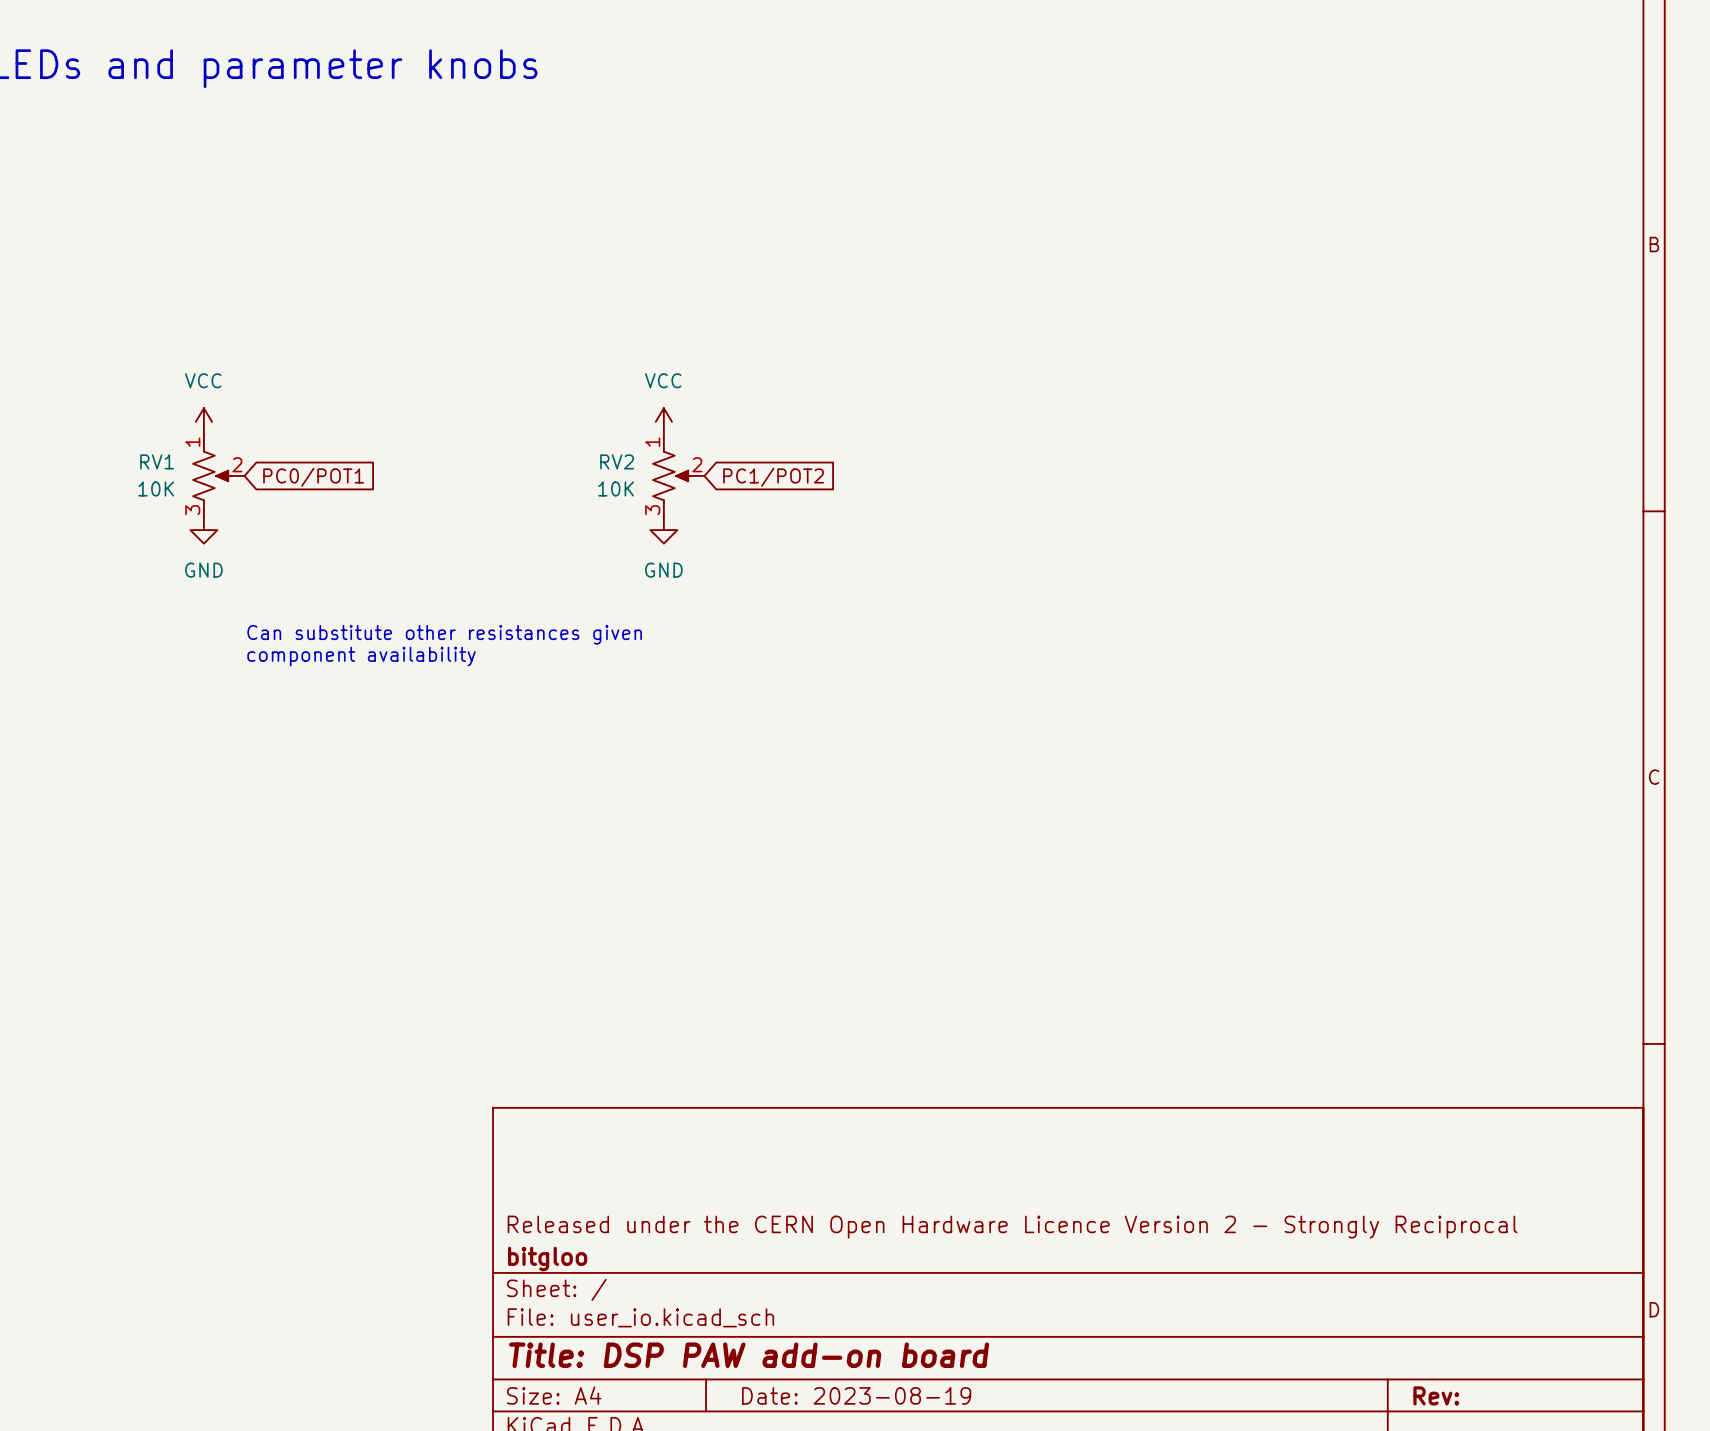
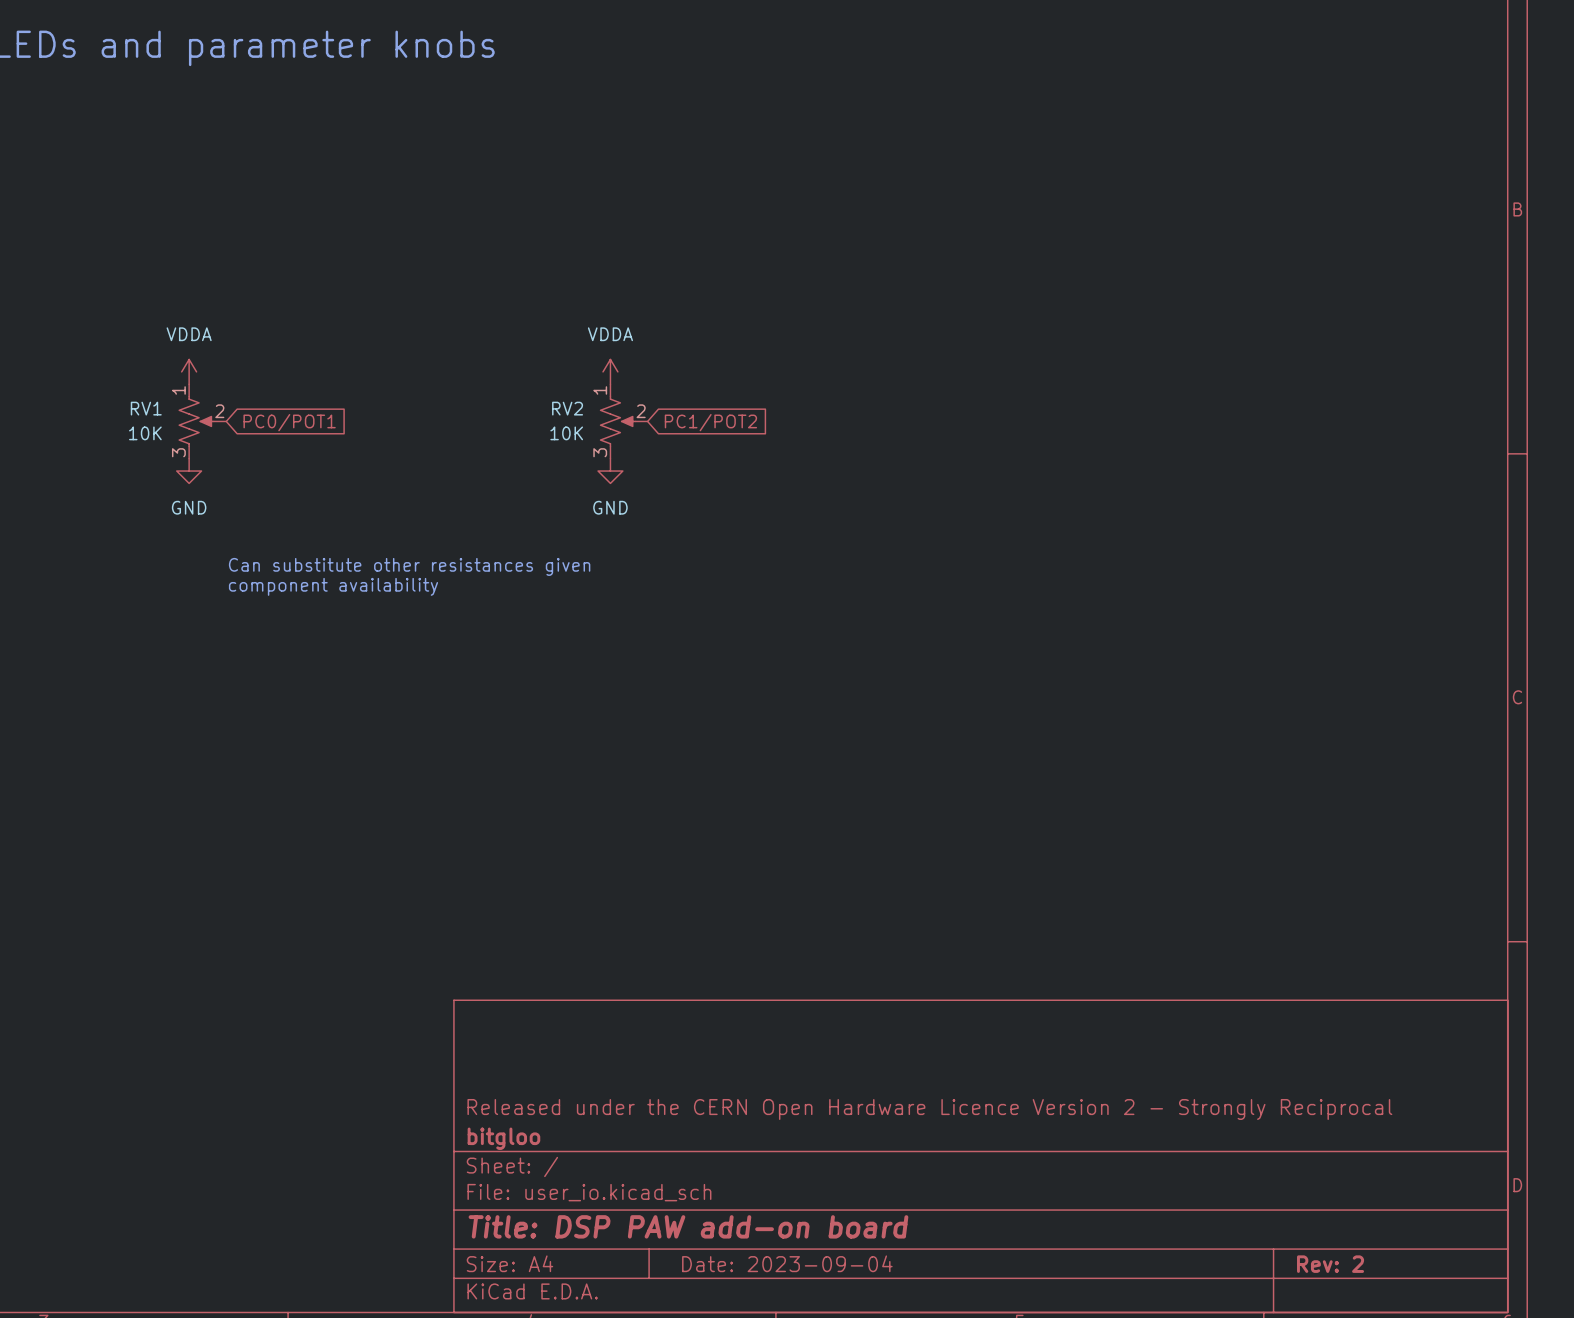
power symbol: VCC (203, 421) -> VDDA (189, 371)
power symbol: VCC (663, 421) -> VDDA (610, 371)
title block: Date: 2023-08-19 (856, 1395) -> Date: 2023-09-04 (787, 1263)
title block: Rev: (1436, 1395) -> Rev: 2 (1330, 1264)

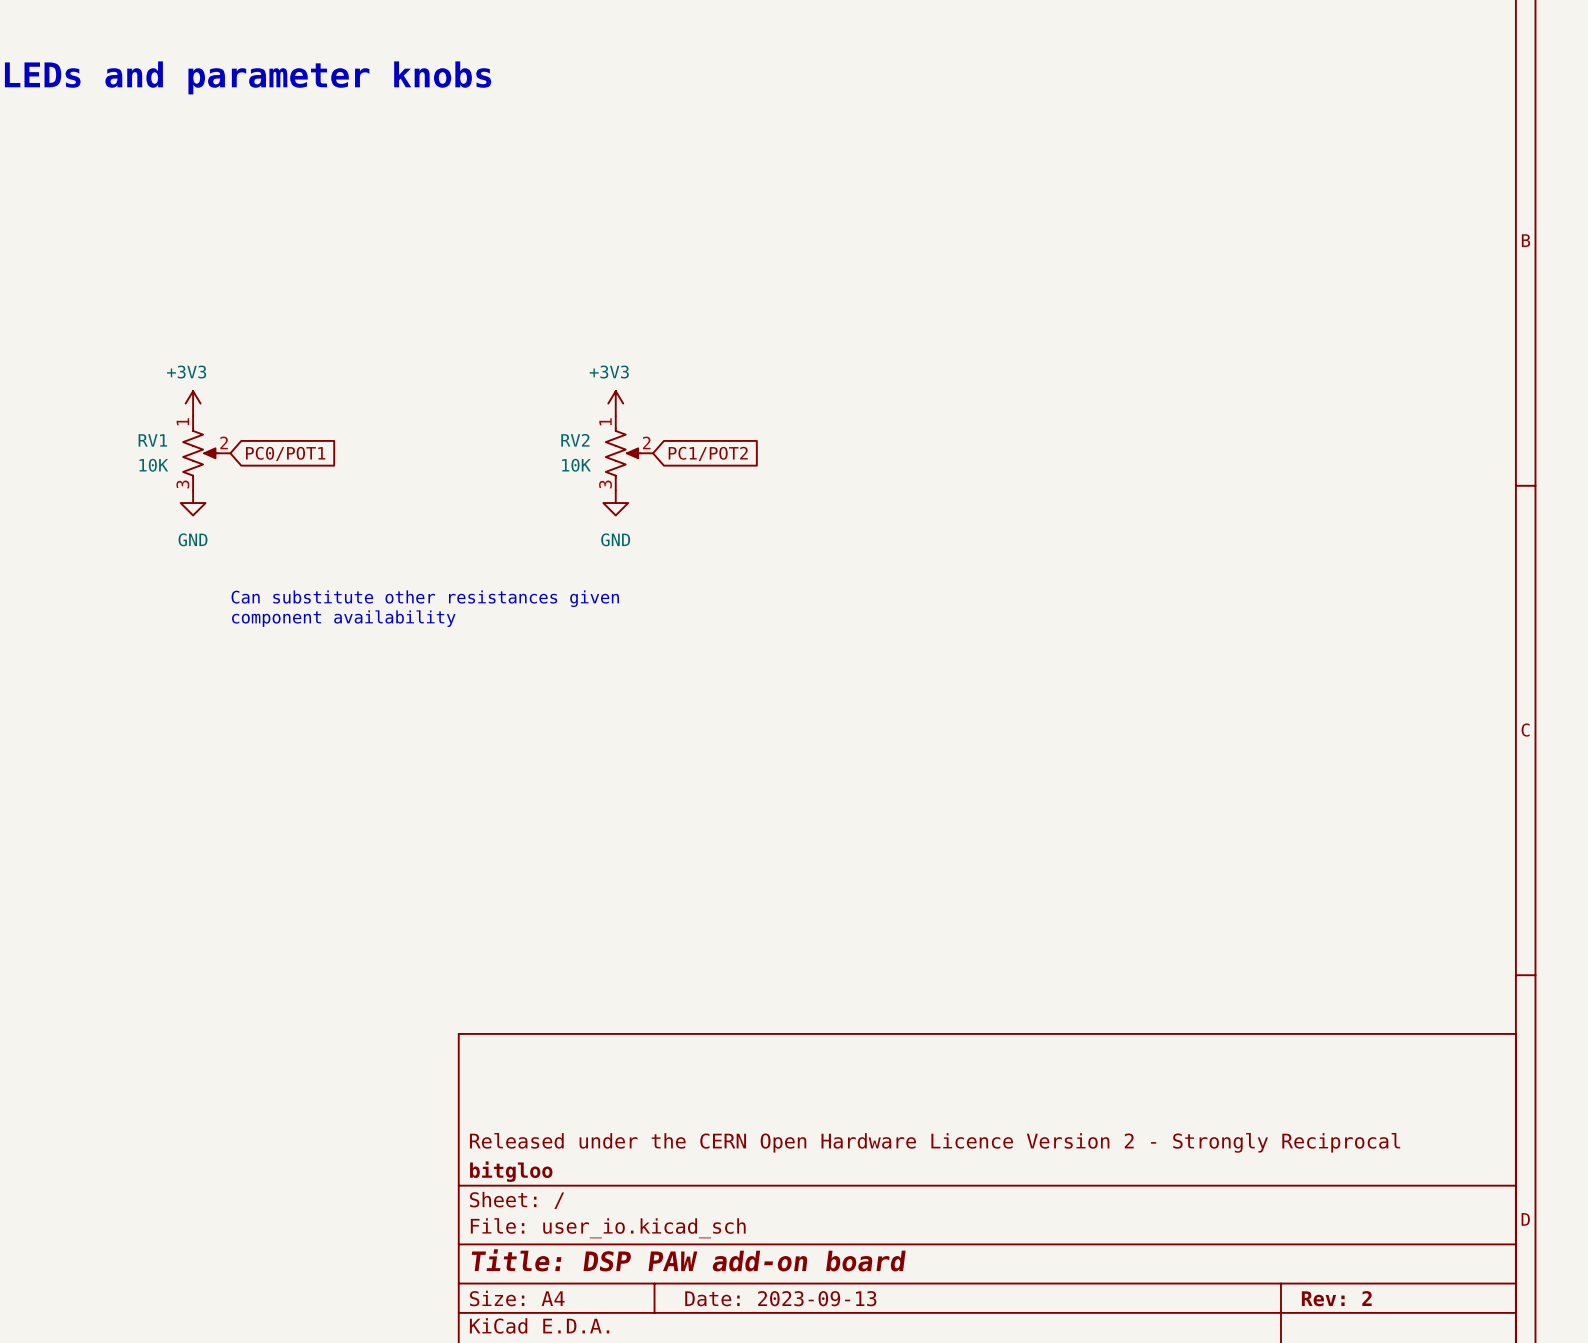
power symbol: VDDA (189, 371) -> +3V3 (193, 403)
power symbol: VDDA (610, 371) -> +3V3 (615, 403)
title block: Date: 2023-09-04 (787, 1263) -> Date: 2023-09-13 (780, 1298)

